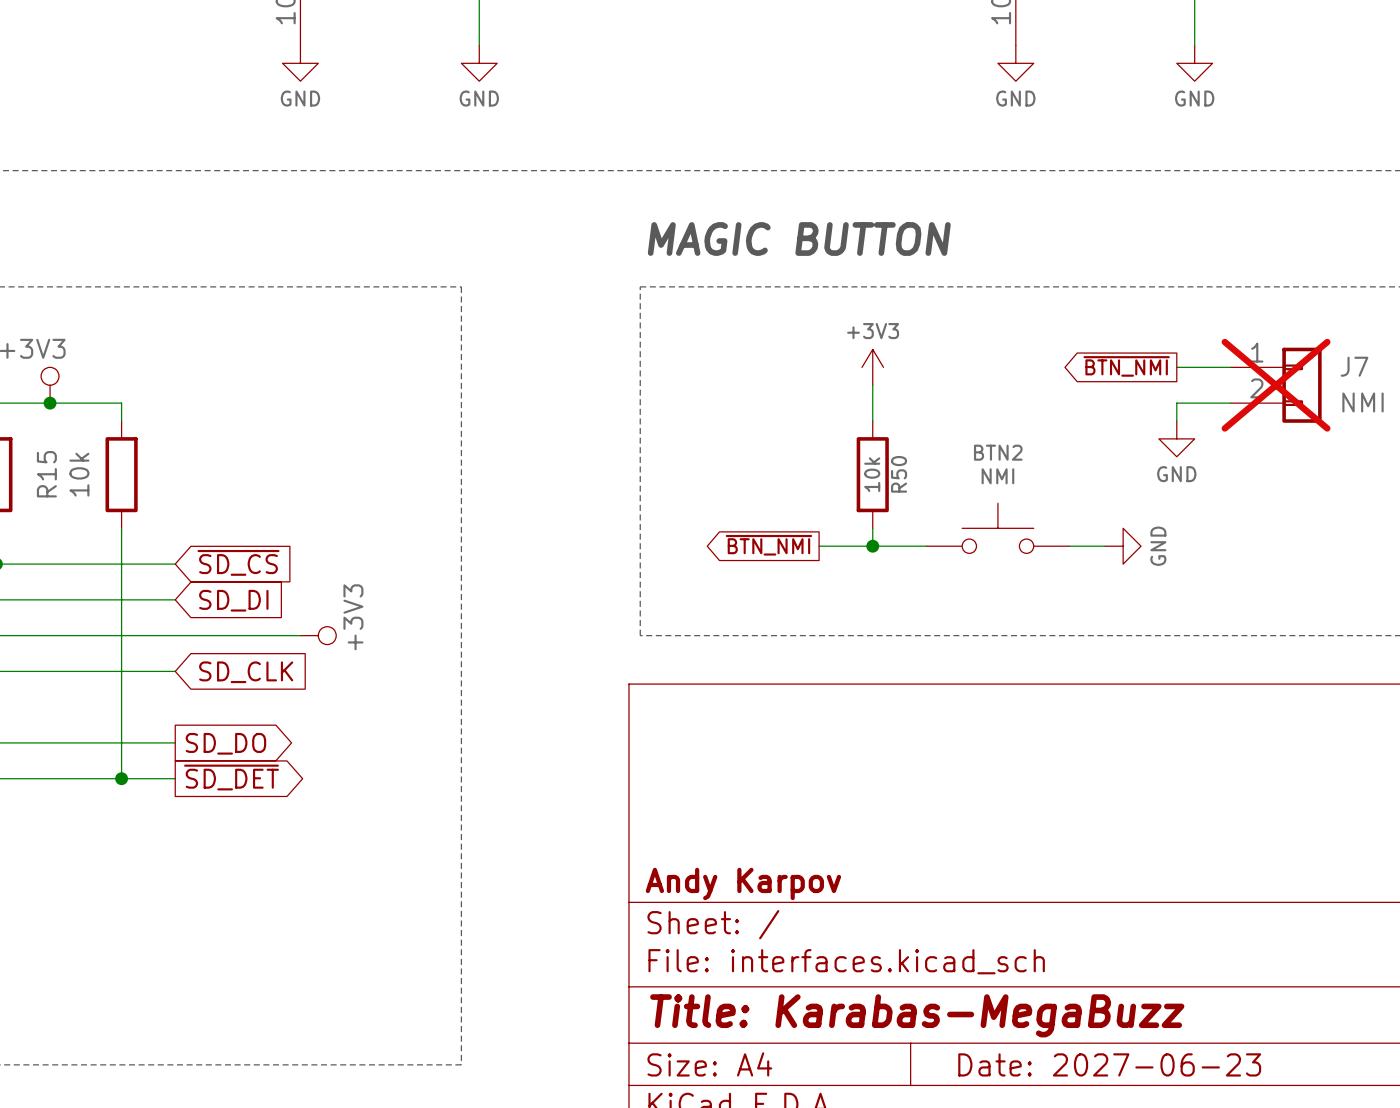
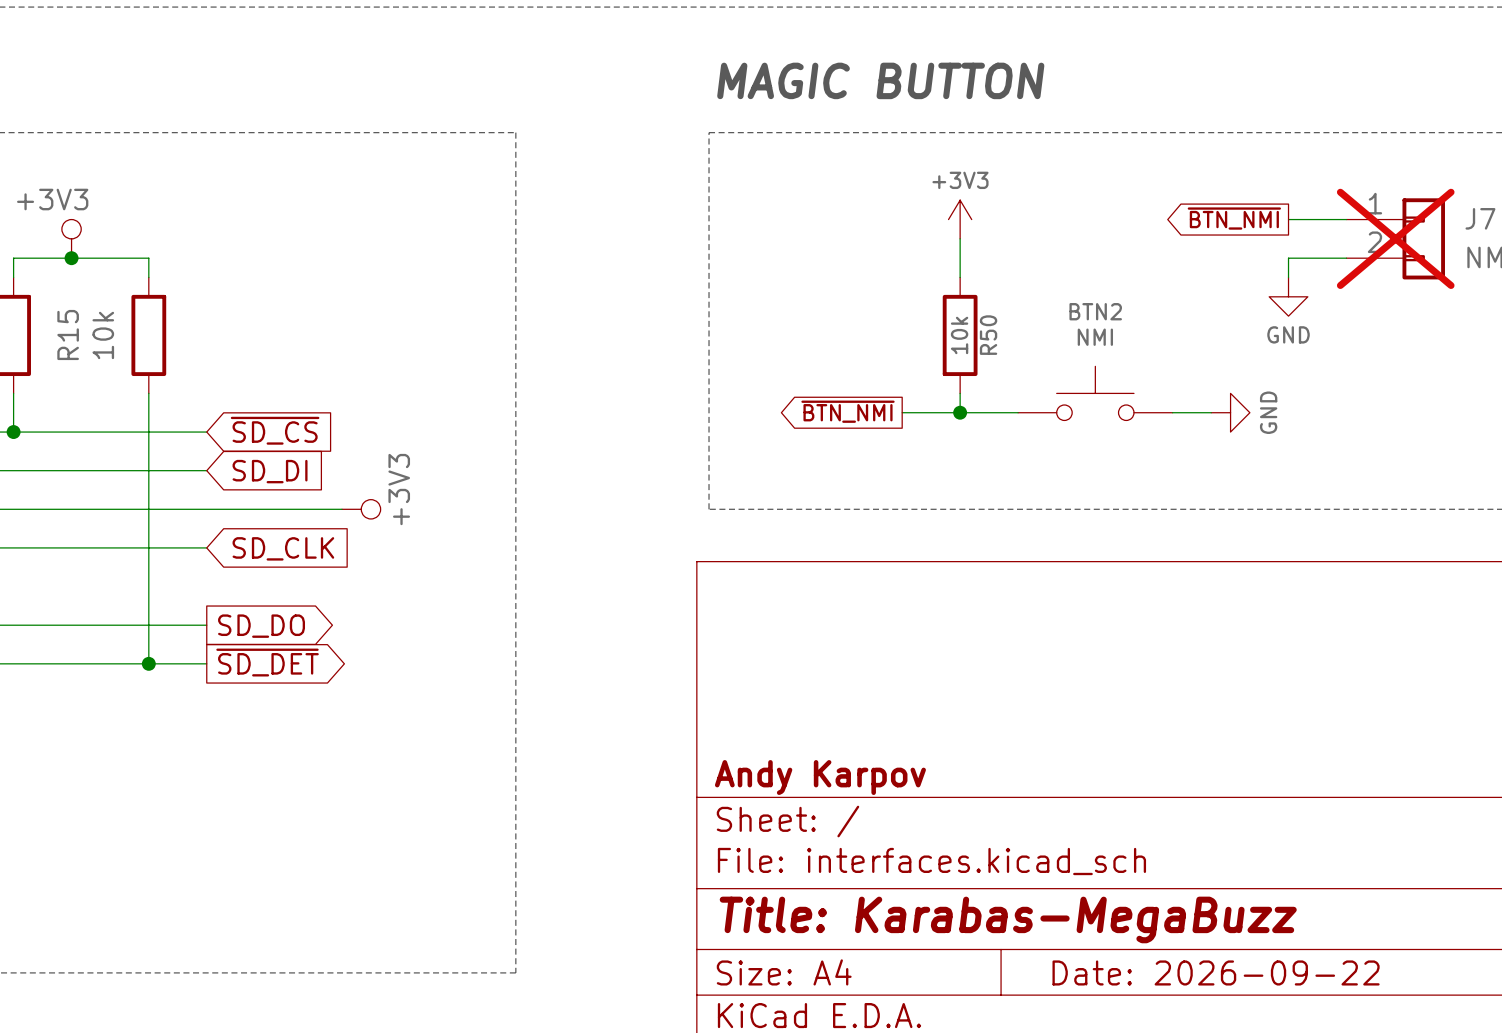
title block: Date: 2027-06-23 (1109, 1064) -> Date: 2026-09-22 (1216, 972)

